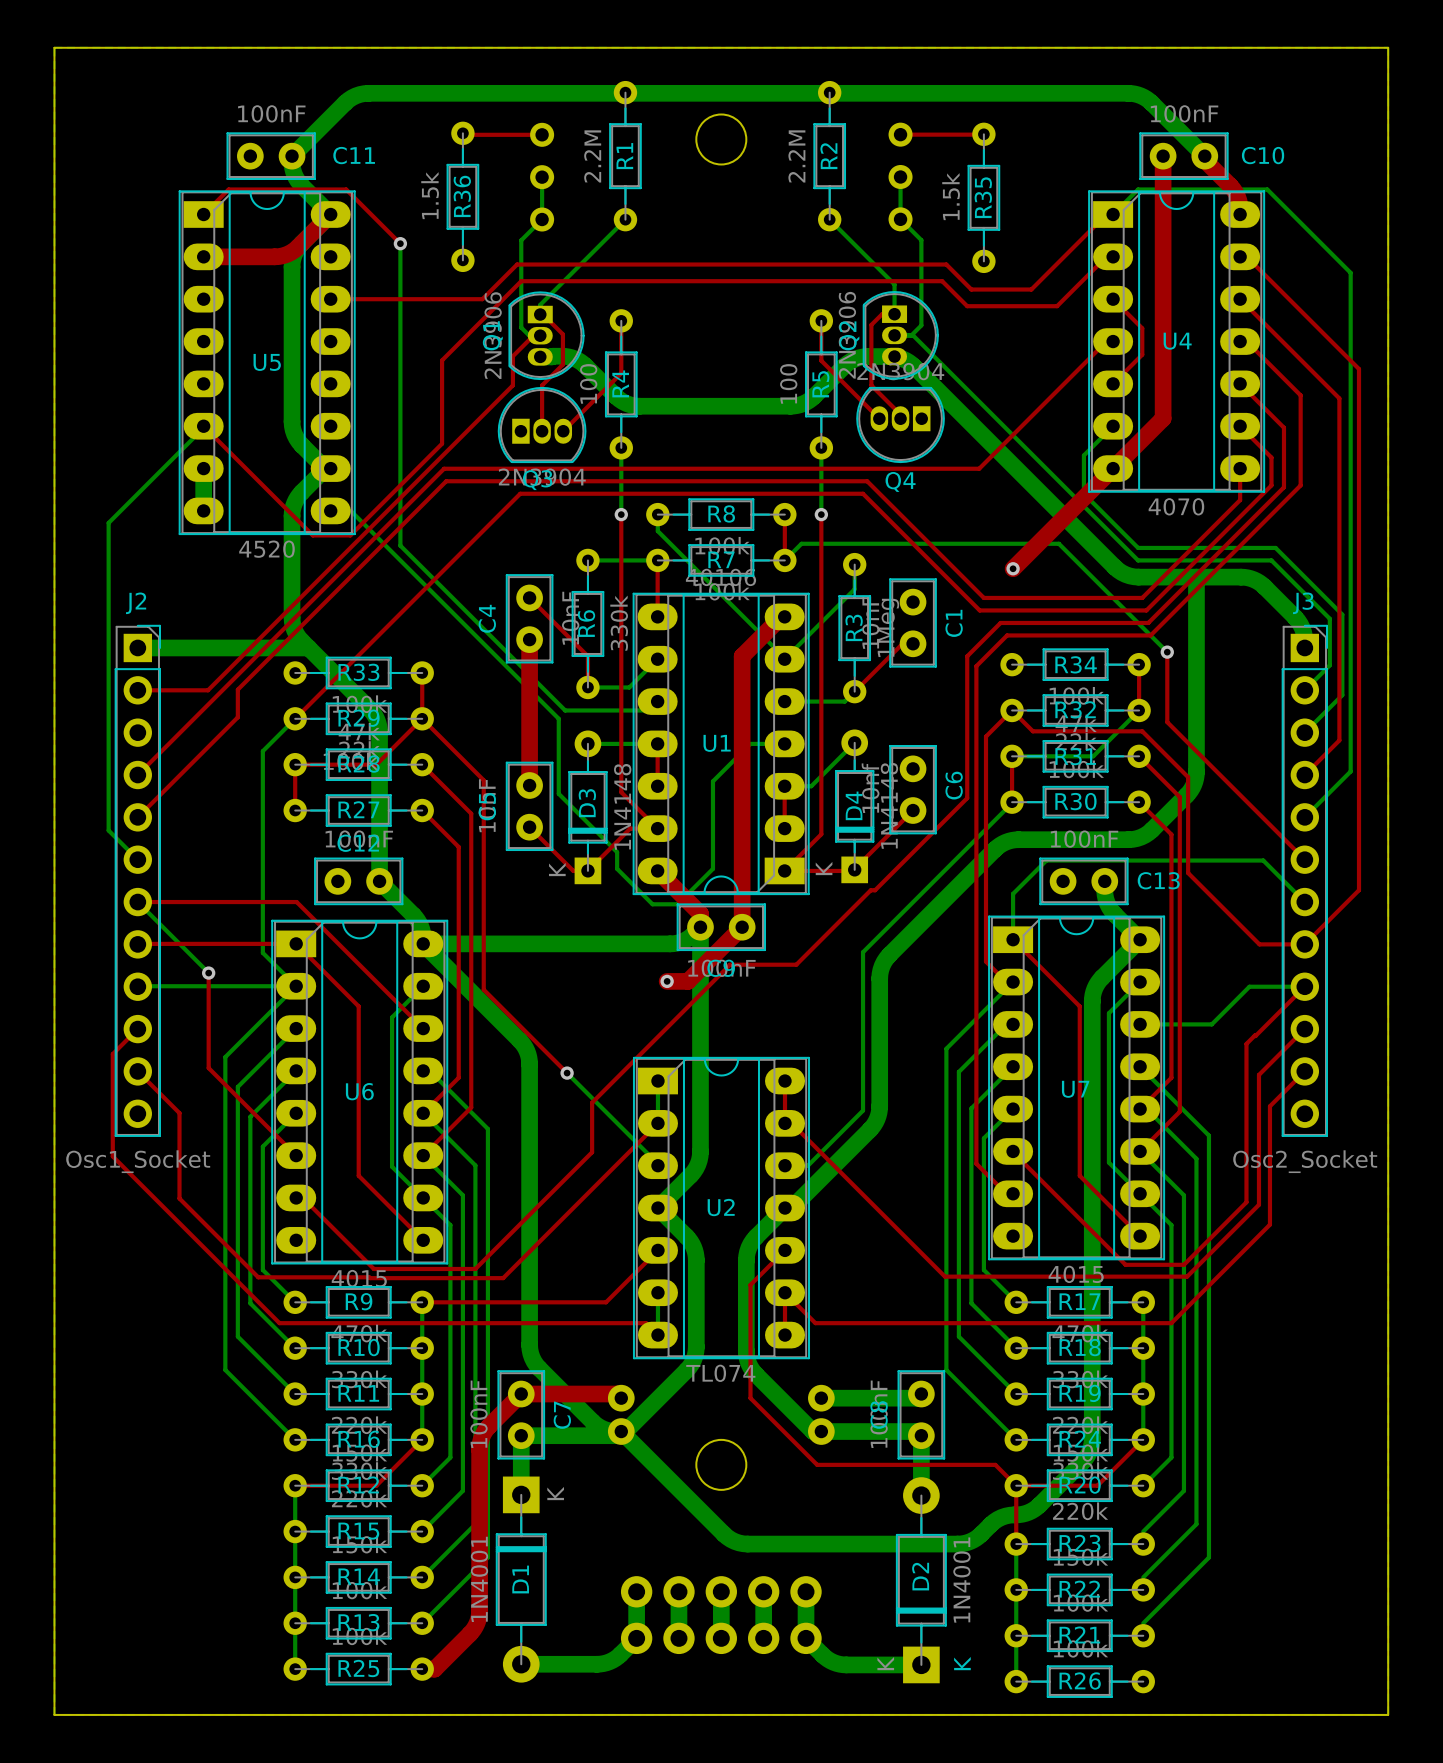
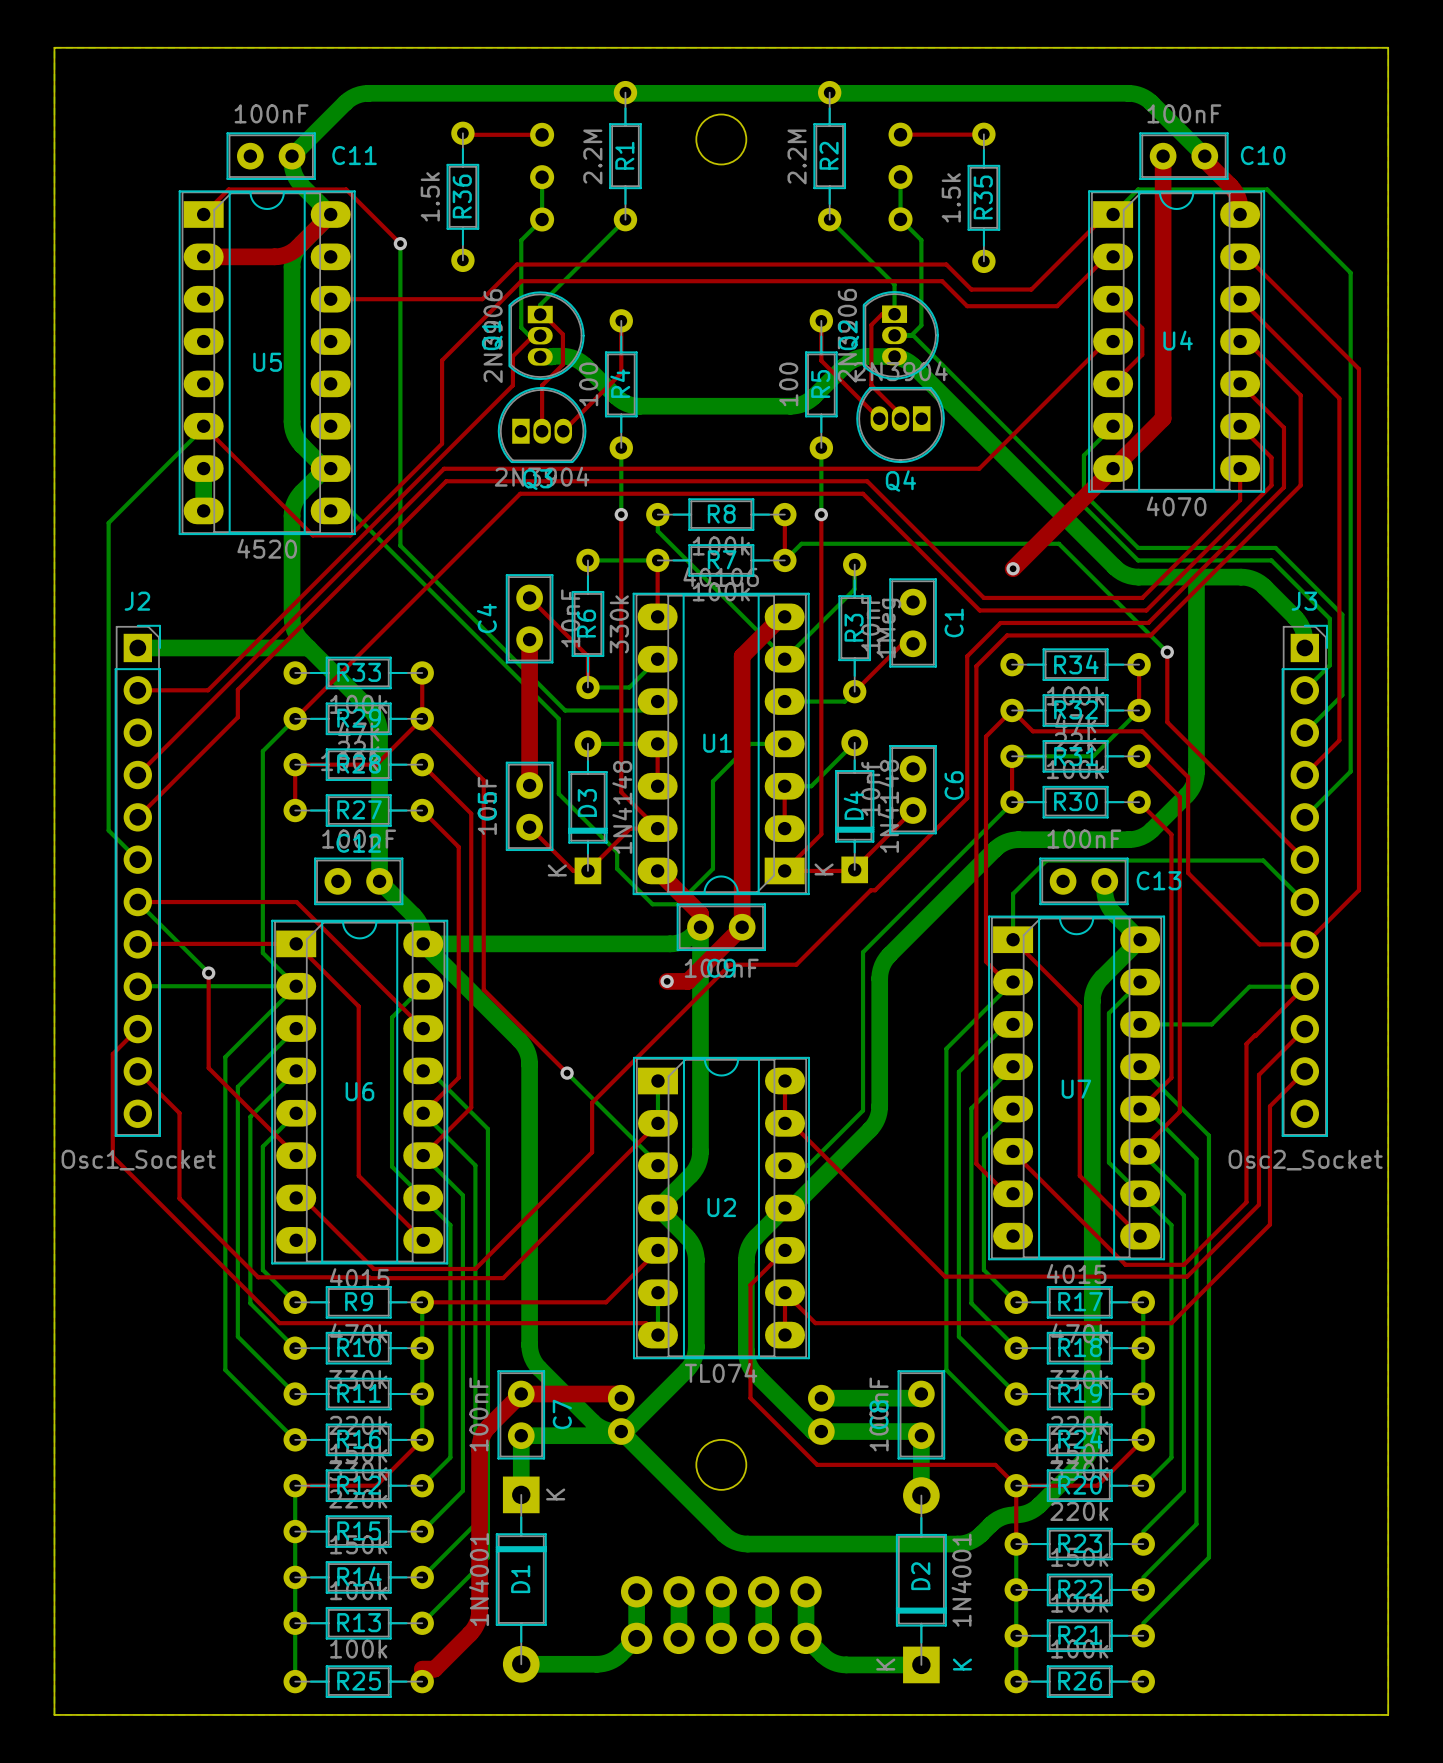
R25 position: (358, 1669) -> (358, 1681)

